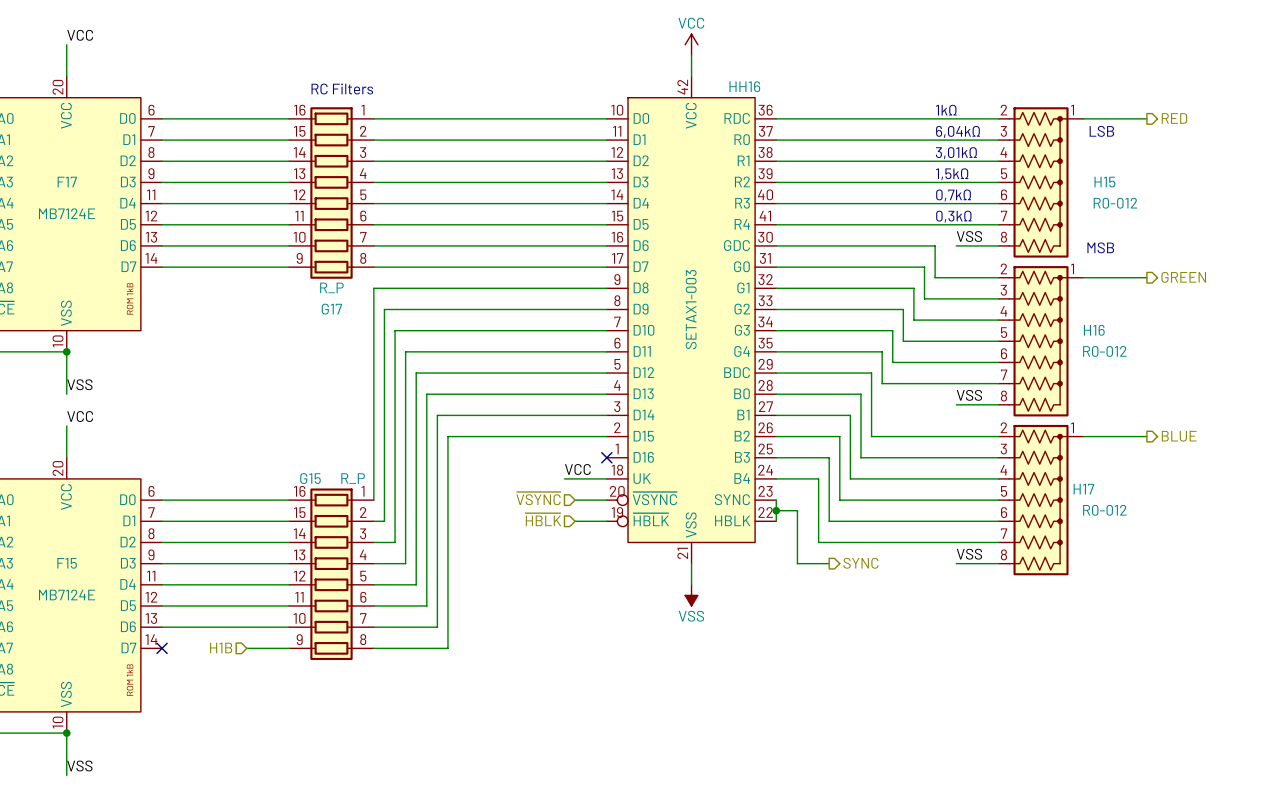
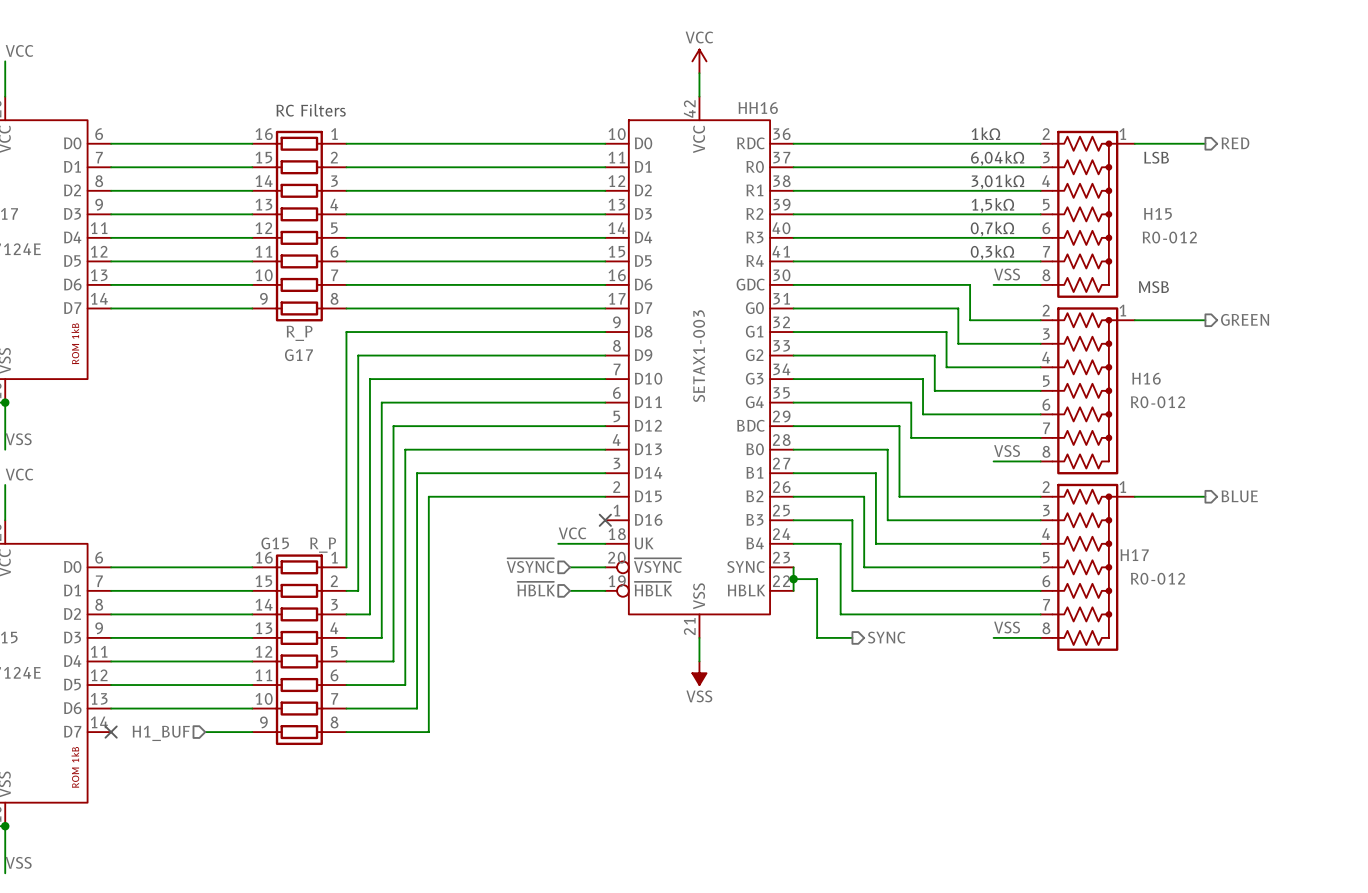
hierarchical label: H1B (221, 647) -> H1_BUF (161, 733)

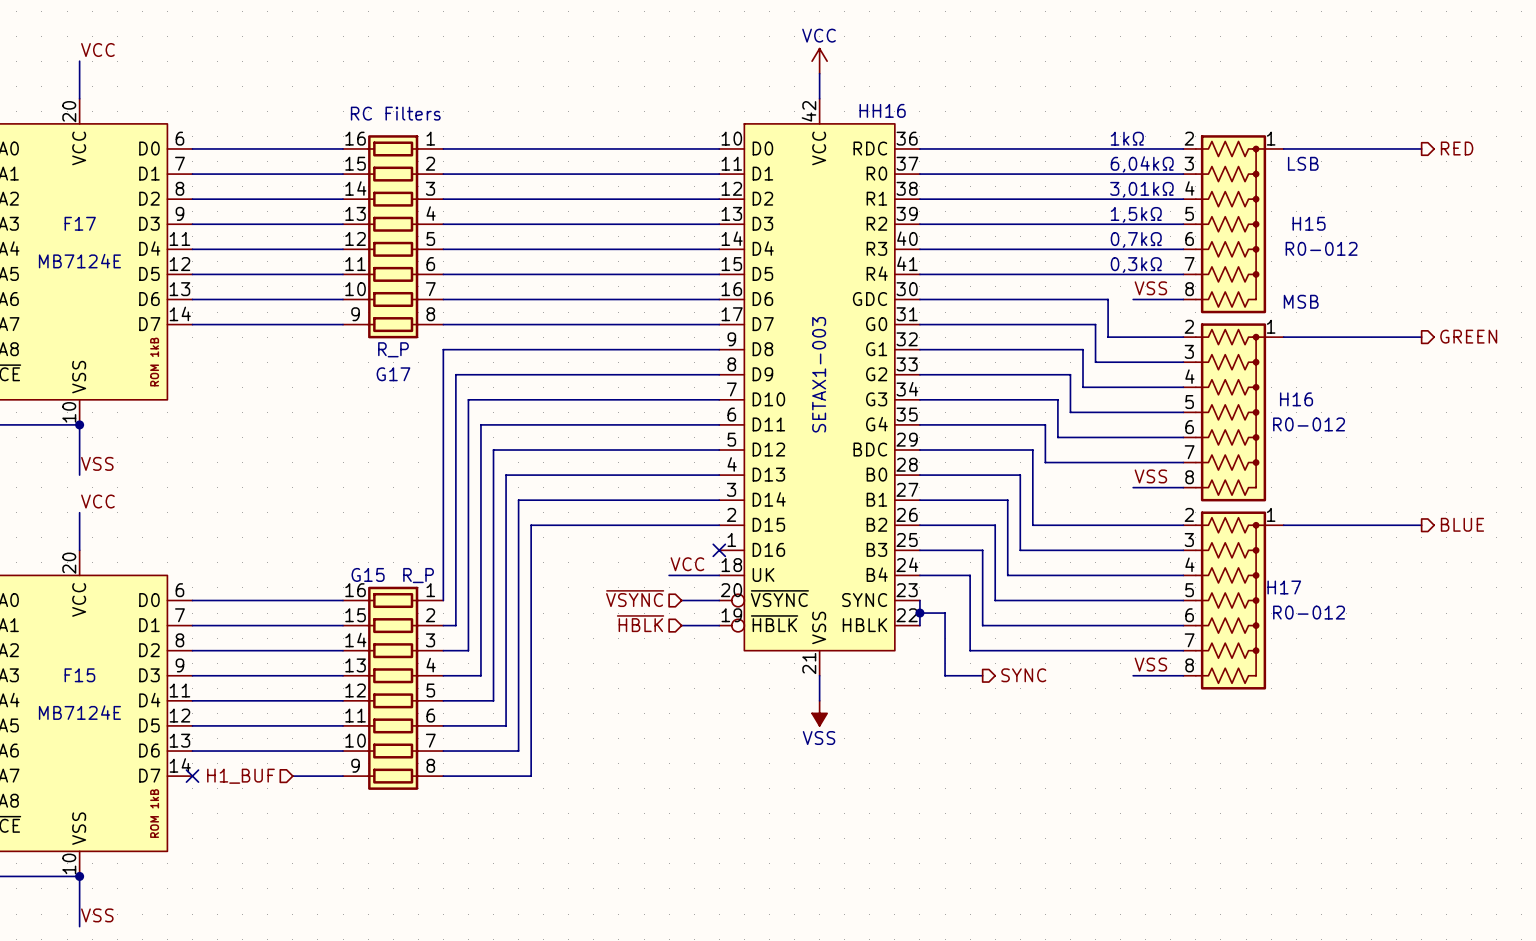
wire: none -> (1358, 148) (1421, 148)
hierarchical label position: RED (1235, 143) -> RED (1457, 148)
hierarchical label position: GREEN (1245, 319) -> GREEN (1468, 336)
wire: none -> (1358, 337) (1421, 337)
wire: none -> (1358, 525) (1421, 525)
hierarchical label position: BLUE (1239, 496) -> BLUE (1462, 524)

